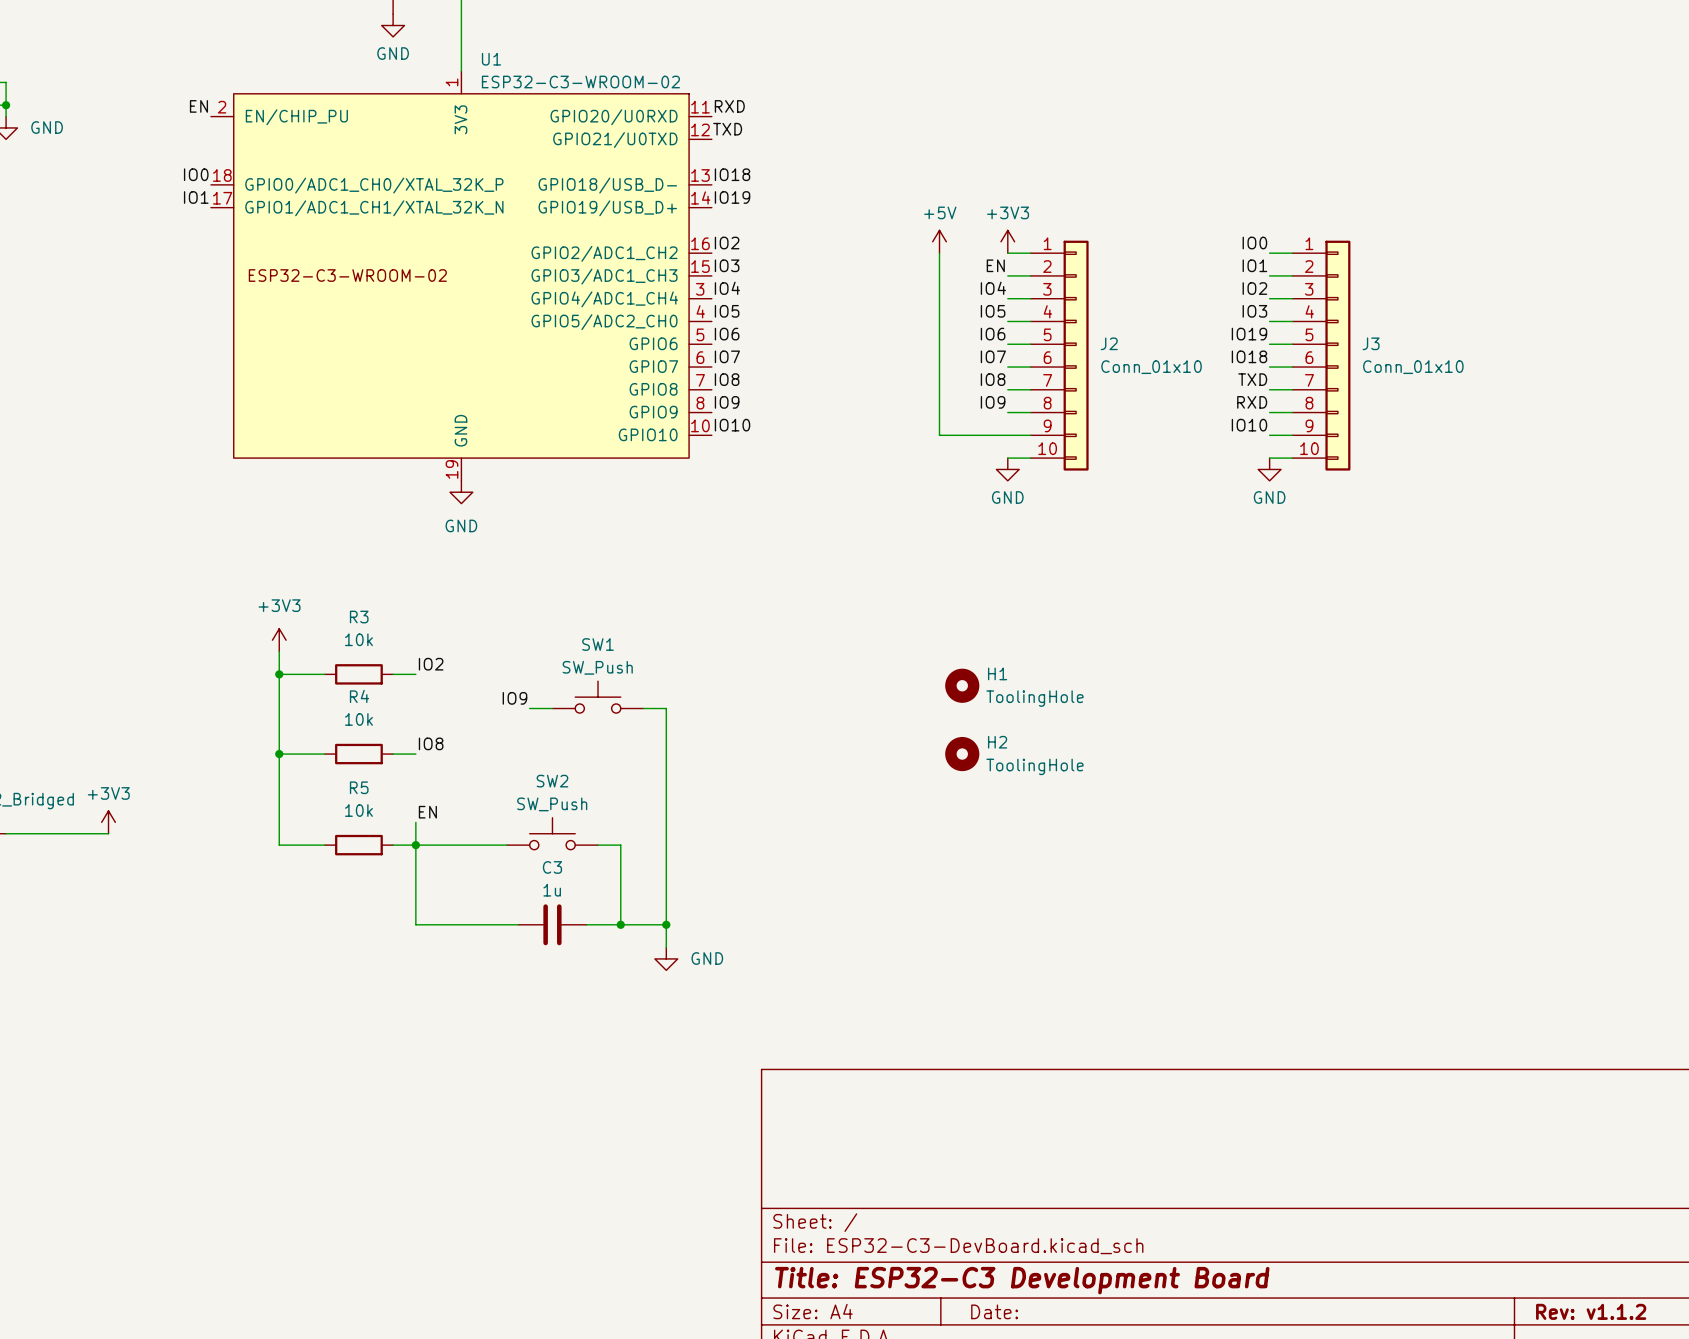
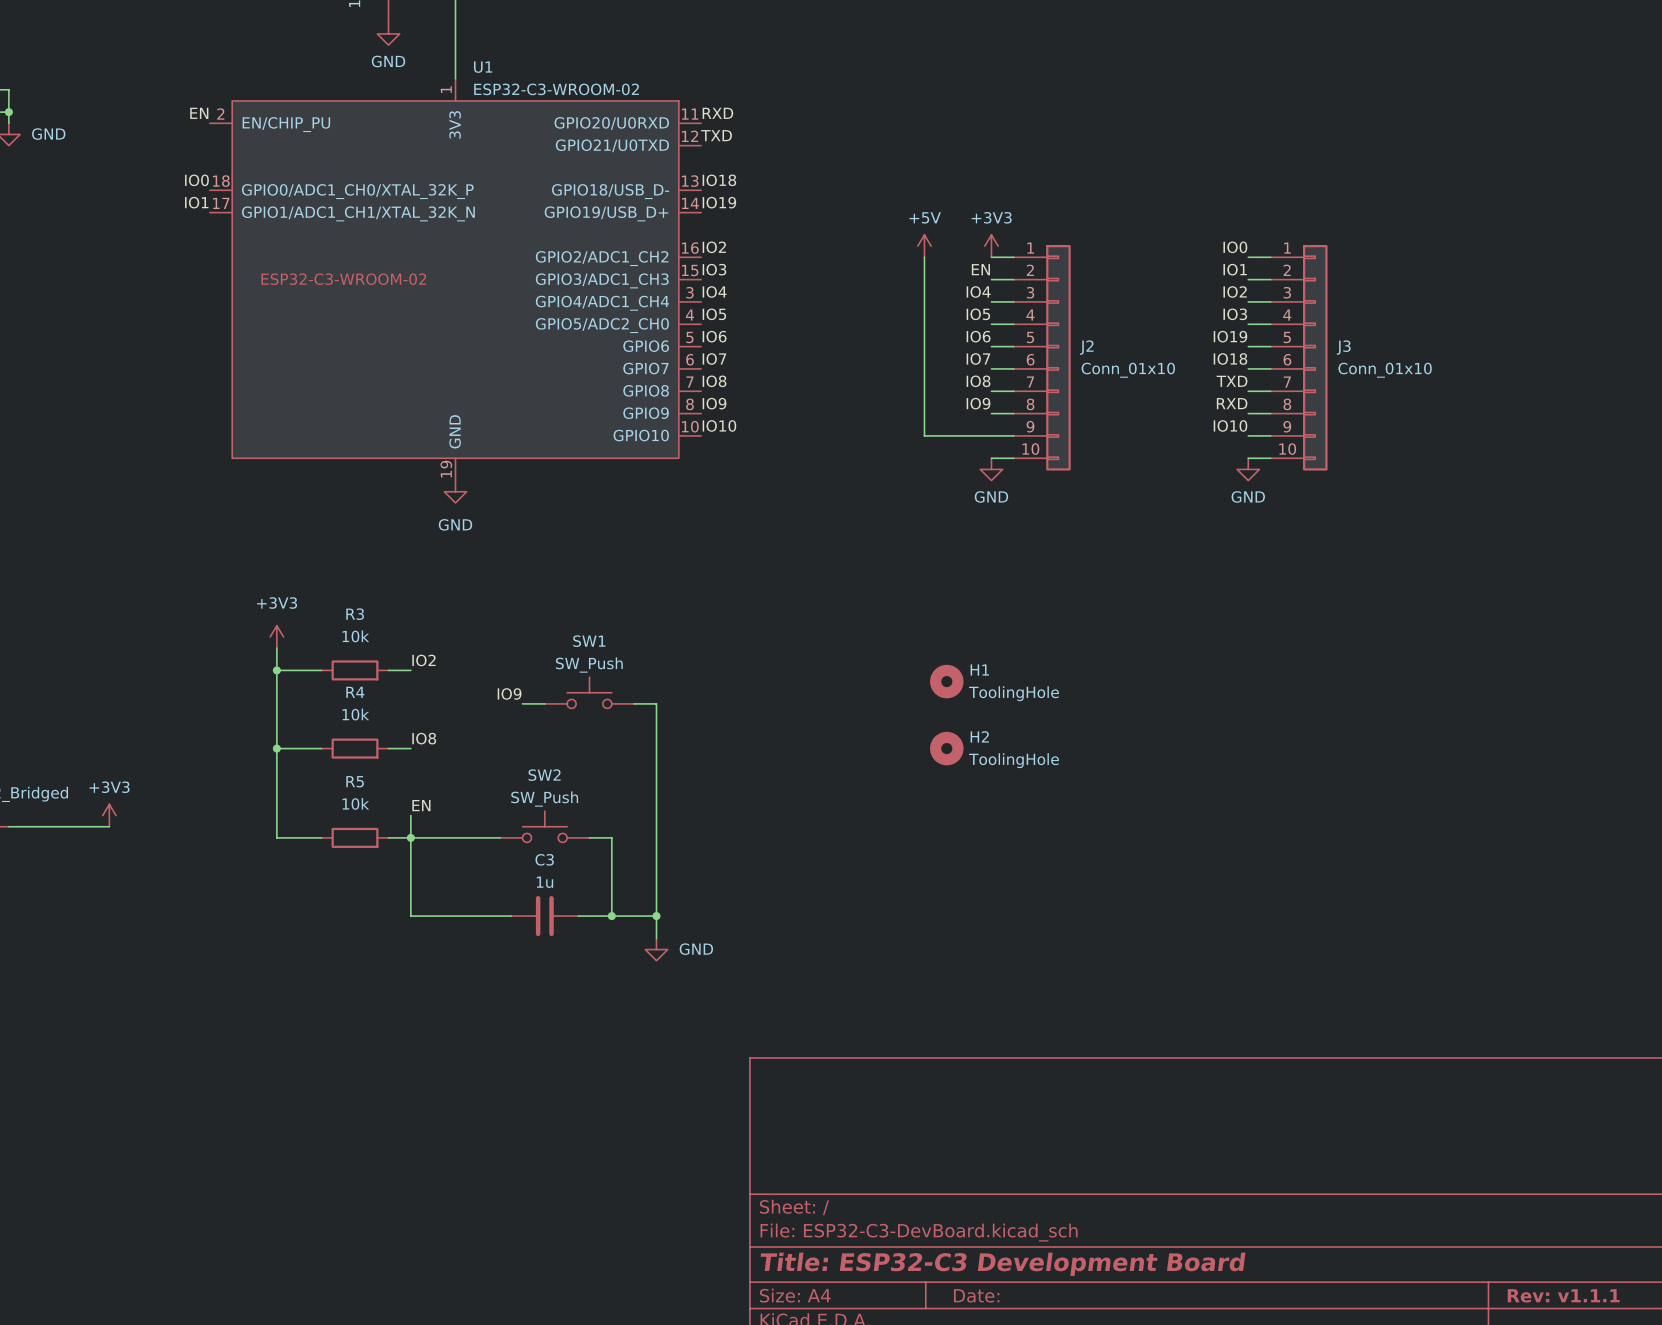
title block: Rev: v1.1.2 (1591, 1311) -> Rev: v1.1.1 (1563, 1295)

